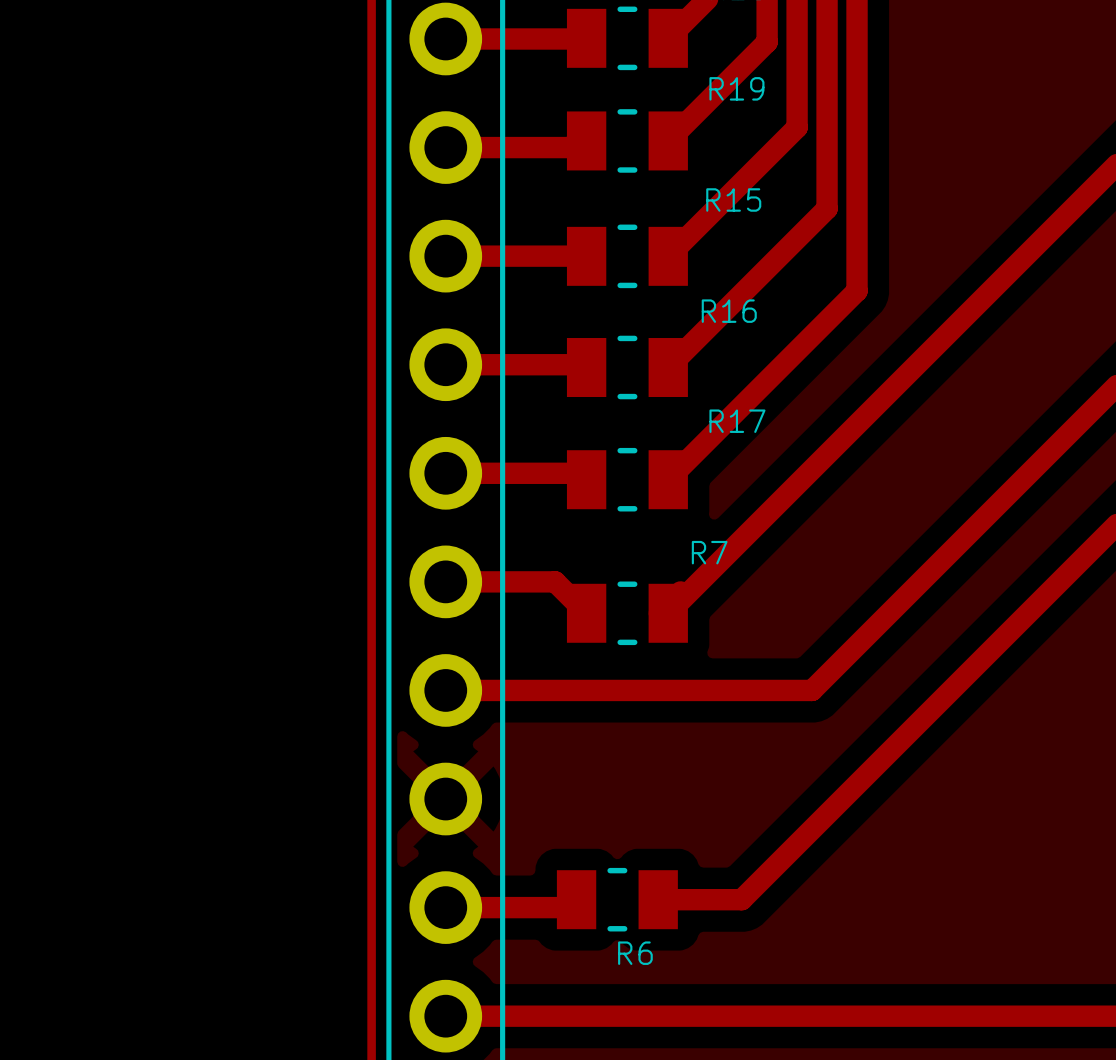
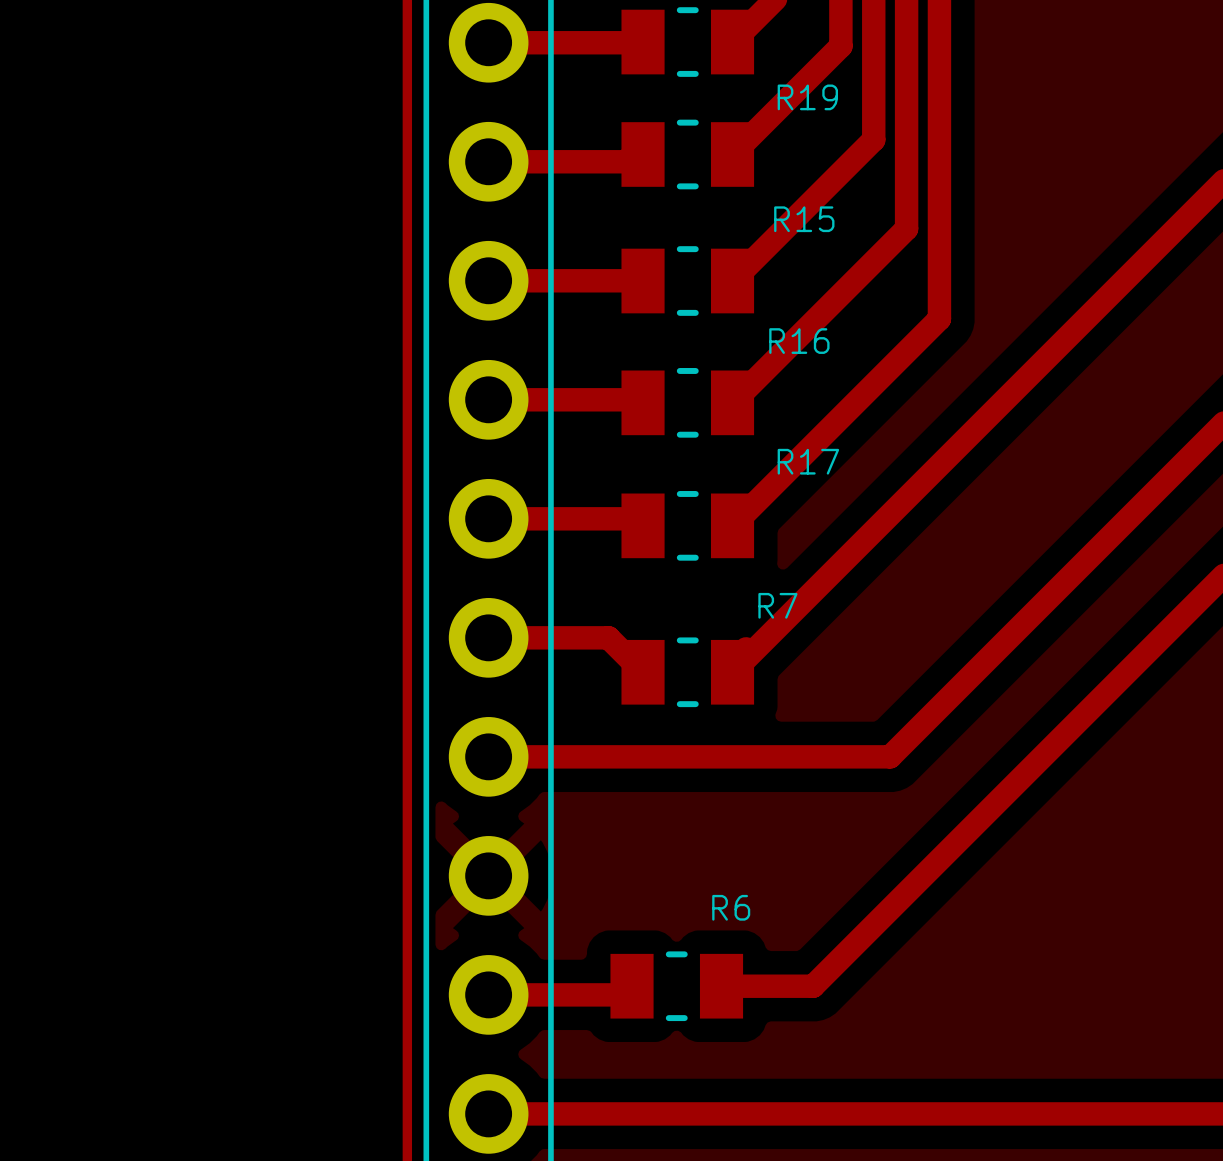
R6 name position: R6 (635, 953) -> R6 (731, 907)

